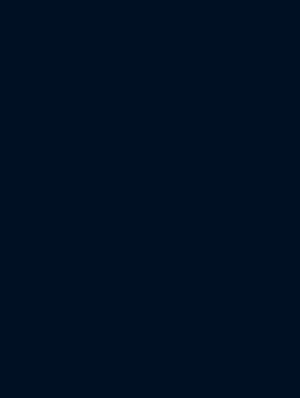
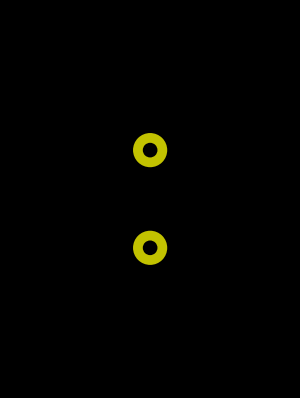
part: none -> (150, 150)
part: none -> (150, 247)

